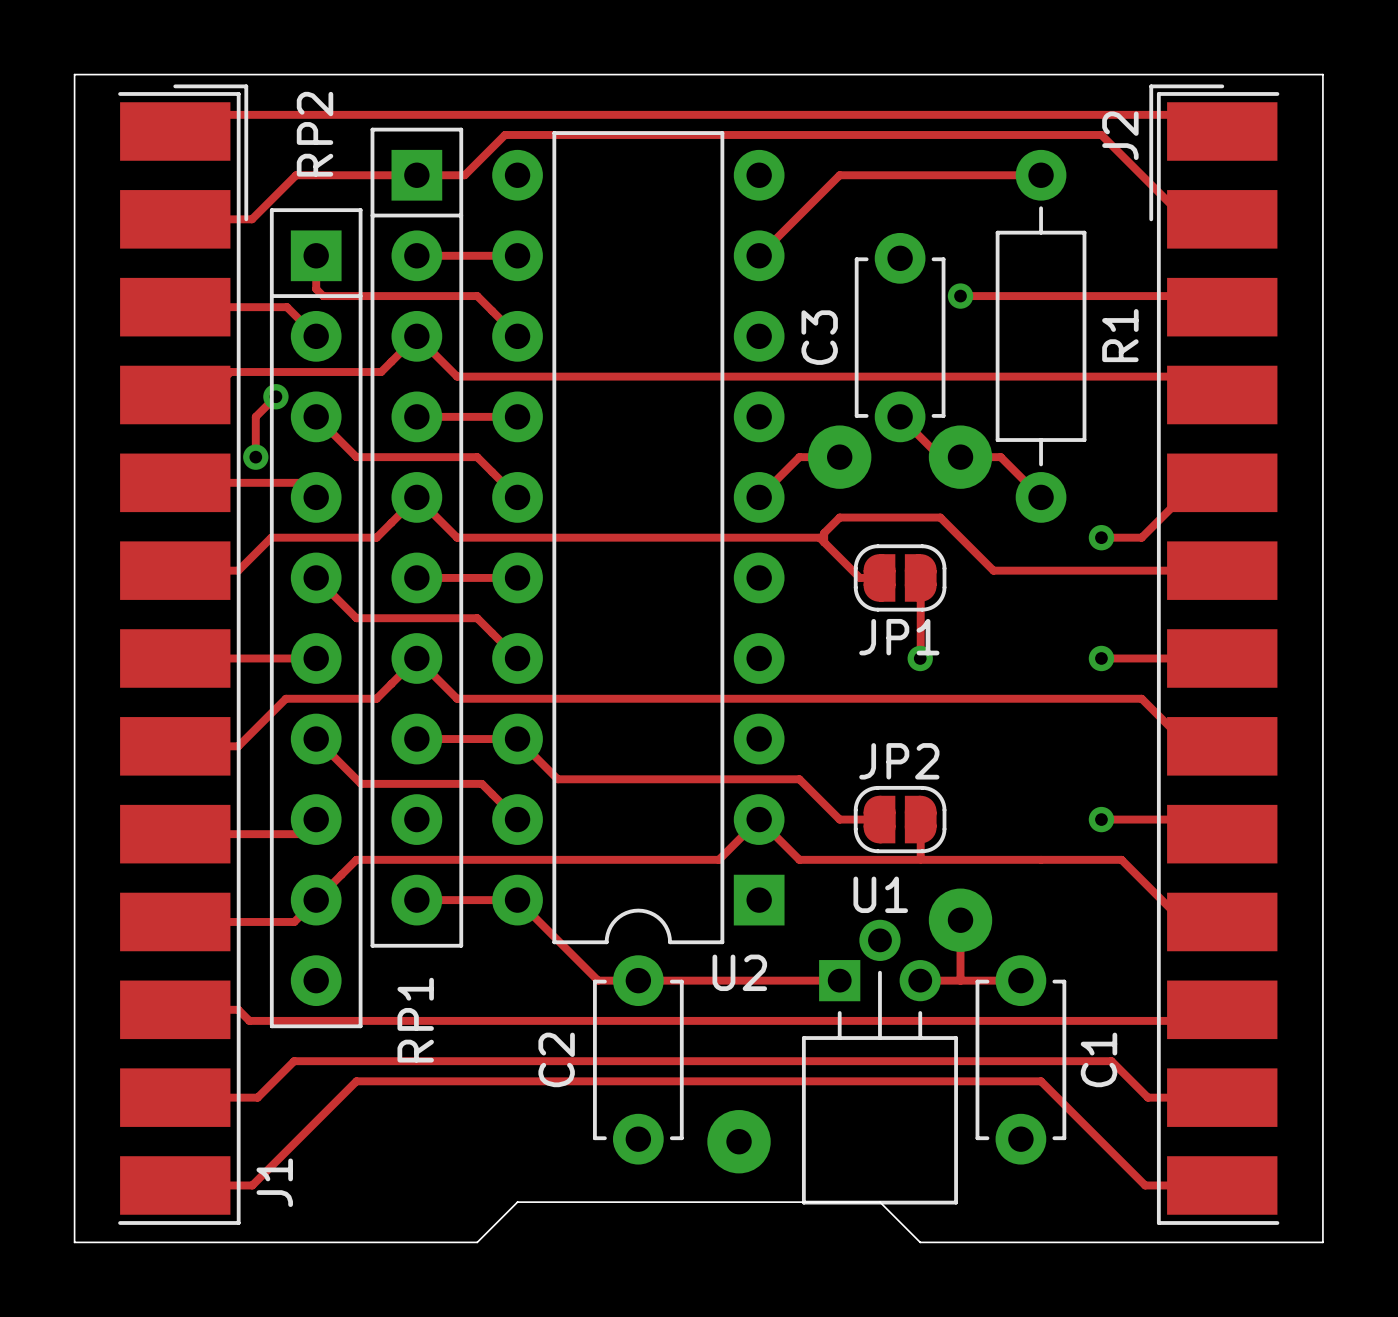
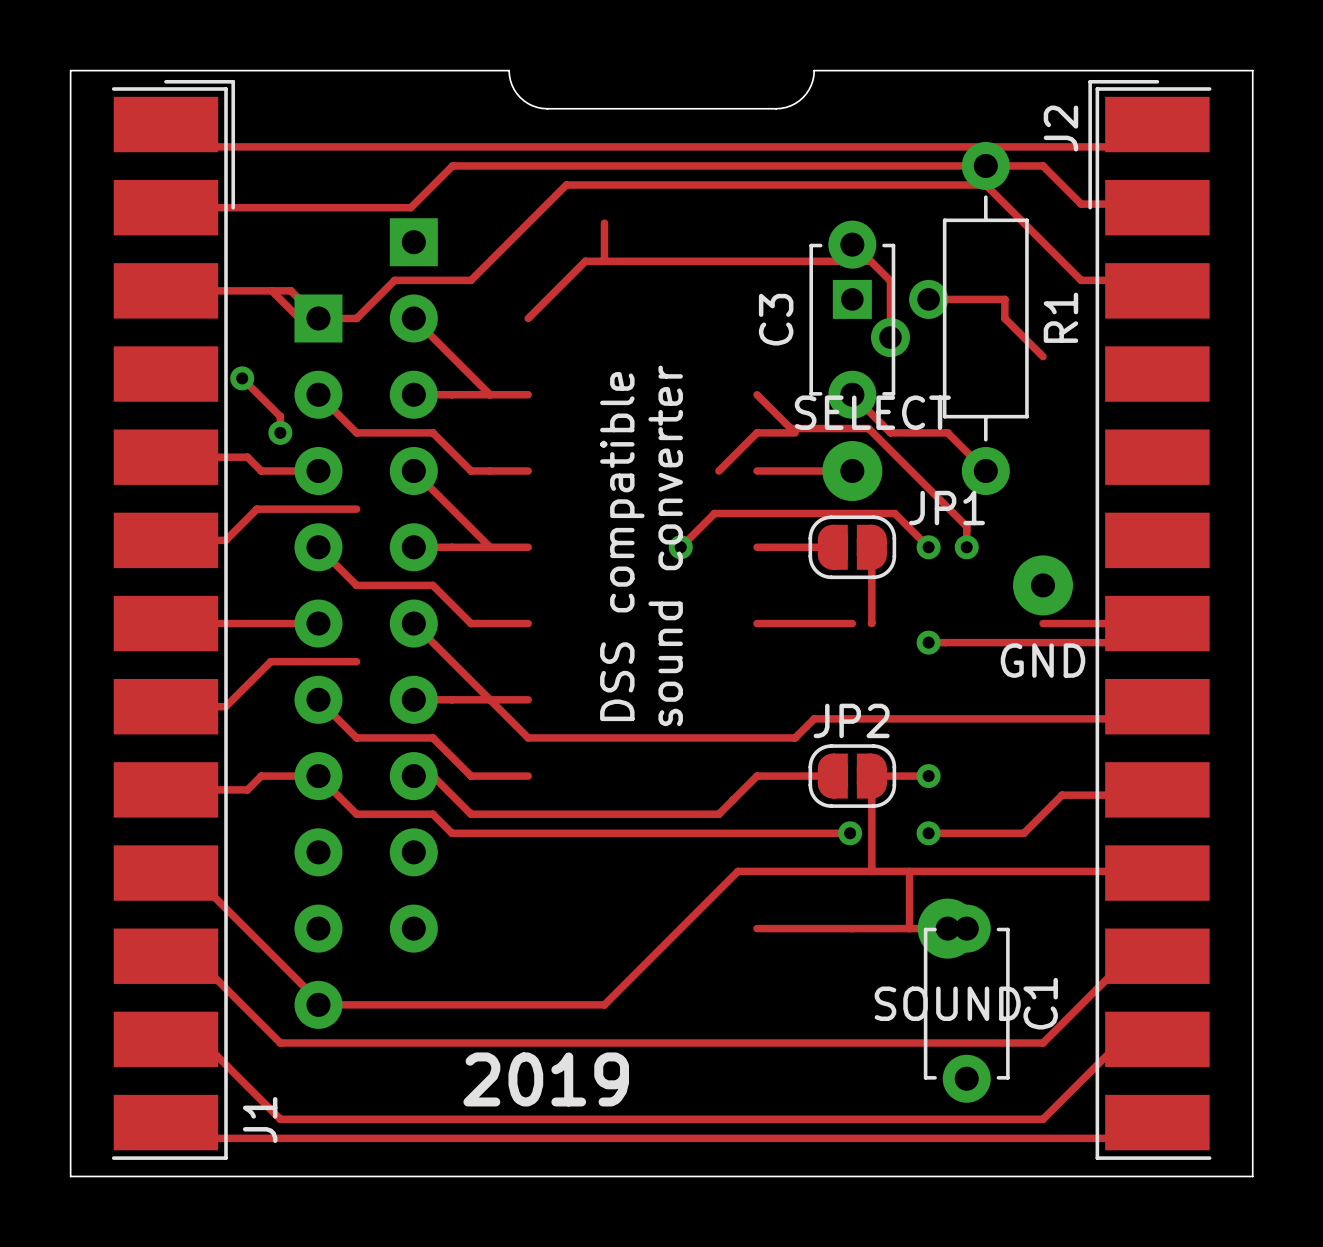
board edge: (537, 74) (859, 74) -> (509, 70) (512, 85) (520, 97) (532, 105) (547, 108) (781, 108) (795, 103) (806, 93) (812, 80) (814, 70)
track: (175, 131) (191, 114) (1202, 114) (1218, 131) -> (165, 124) (188, 146) (1131, 146) (1154, 124)
track: (839, 175) (759, 255) -> none
track: none -> (985, 165) (1043, 165) (1081, 204) (1138, 204)
track: (1181, 215) (1101, 134) (505, 134) (464, 175) (296, 175) (251, 219) -> (795, 165) (452, 165) (410, 207) (238, 207)
track: none -> (604, 223) (604, 261)
track: (316, 255) (316, 289) (323, 296) (416, 296) -> (271, 290) (290, 290) (318, 318) (356, 318) (394, 280)
track: (416, 255) (517, 255) -> (757, 471) (852, 471)
track: (477, 296) (517, 336) -> none
track: (960, 296) (1141, 296) -> (451, 280) (471, 280) (566, 185) (985, 185) (1081, 280)
via: (960, 296) -> none
track: none -> (928, 299) (1004, 299) (1004, 318) (1043, 356)
track: none -> (413, 318) (490, 394) (528, 394)
track: none -> (528, 318) (585, 261) (870, 261) (890, 280) (890, 337)
track: (175, 394) (207, 394) (230, 372) (381, 372) (416, 336) (457, 376) (1202, 376) (1222, 396) -> none
track: (275, 396) (255, 416) (255, 457) -> none
via position: (275, 396) -> (242, 378)
track: none -> (242, 378) (280, 416) (280, 432)
track: (316, 416) (356, 457) (376, 457) -> (318, 394) (356, 432)
track: none -> (757, 394) (790, 428) (868, 428) (966, 526) (966, 547)
via: (255, 457) -> none
via: none -> (280, 432)
track: (457, 457) (477, 457) (517, 497) -> (432, 432) (471, 471) (528, 471)
part: (839, 457) -> none
part: (960, 457) -> none
track: (1202, 477) (1141, 537) (1101, 537) -> none
track: (261, 482) (301, 482) (316, 497) -> (247, 457) (261, 471) (318, 471)
track: none -> (413, 471) (490, 547) (528, 547)
part: none -> SELECT (852, 471)
track: (376, 537) (416, 497) (457, 537) (819, 537) (859, 577) -> (757, 547) (814, 547)
RP1 side: top (416, 537) -> bottom (413, 585)
U2: (638, 537) -> none
via: (1101, 537) -> none
track: (824, 542) (824, 533) (839, 517) (940, 517) (993, 570) (1222, 570) -> none
text: none -> sound converter (665, 545)
track: (316, 577) (356, 618) (376, 618) -> (318, 547) (356, 585)
text: none -> DSS compatible (622, 546)
track: none -> (680, 547) (714, 513) (894, 513) (928, 547)
via: none -> (680, 547)
via: none -> (928, 547)
via: none -> (966, 547)
RP2 side: top (316, 618) -> bottom (318, 661)
track: (457, 618) (477, 618) (517, 658) -> (432, 585) (471, 623) (528, 623)
part: none -> GND (1043, 585)
JP1 name position: JP1 (899, 637) -> JP1 (946, 508)
track: none -> (413, 623) (490, 699) (528, 699)
track: none -> (757, 623) (852, 623)
via: (920, 658) -> none
via: (1101, 658) -> none
track: none -> (1138, 623) (1119, 642) (928, 642)
via: none -> (928, 642)
track: (376, 698) (416, 658) (457, 698) (1141, 698) (1181, 739) -> none
track: (316, 739) (361, 783) (481, 783) (517, 819) -> none
track: none -> (318, 699) (356, 737) (432, 737) (471, 776) (528, 776)
track: none -> (1138, 699) (1119, 718) (814, 718) (795, 737) (757, 737)
track: (799, 779) (839, 819) -> (680, 814) (718, 814) (757, 776) (795, 776)
track: (316, 819) (301, 834) (261, 834) -> (356, 814) (318, 776) (261, 776) (247, 789)
track: none -> (871, 776) (928, 776)
via: none -> (928, 776)
track: (1101, 819) (1181, 819) (1202, 839) -> (928, 833) (1023, 833) (1062, 795) (1138, 795)
via: (1101, 819) -> none
track: (376, 859) (356, 859) (294, 921) (201, 921) -> none
track: (457, 859) (497, 859) -> (413, 776) (432, 776) (471, 814)
track: none -> (432, 814) (451, 833) (850, 833)
track: (718, 859) (759, 819) (799, 859) (1121, 859) (1181, 920) -> none
track: none -> (871, 813) (871, 871)
via: none -> (850, 833)
via: none -> (928, 833)
track: (416, 900) (517, 900) (598, 980) (799, 980) -> none
part: (960, 920) -> none
track: none -> (795, 928) (871, 928)
part: none -> SOUND (947, 928)
track: (204, 1009) (238, 1009) (249, 1020) (1202, 1020) -> (193, 956) (280, 1043) (1043, 1043) (1117, 968)
C2: (638, 1059) -> none
track: (336, 1061) (294, 1061) (257, 1097) (211, 1097) -> (318, 1004) (318, 1001) (190, 873)
track: (638, 1061) (1111, 1061) (1147, 1097) (1218, 1097) -> (604, 1004) (737, 871) (1157, 871)
U1 side: top (879, 1062) -> bottom (890, 318)
track: none -> (200, 1039) (280, 1119) (1043, 1119) (1119, 1043) (1157, 1043)
text: none -> 2019 (546, 1079)
part: (739, 1141) -> none
track: (175, 1185) (252, 1185) (356, 1081) (1041, 1081) (1145, 1185) (1218, 1185) -> (165, 1122) (181, 1138) (1138, 1138) (1154, 1122)
board edge: (477, 1242) (517, 1202) (879, 1202) (920, 1242) -> (451, 1176) (871, 1176)

